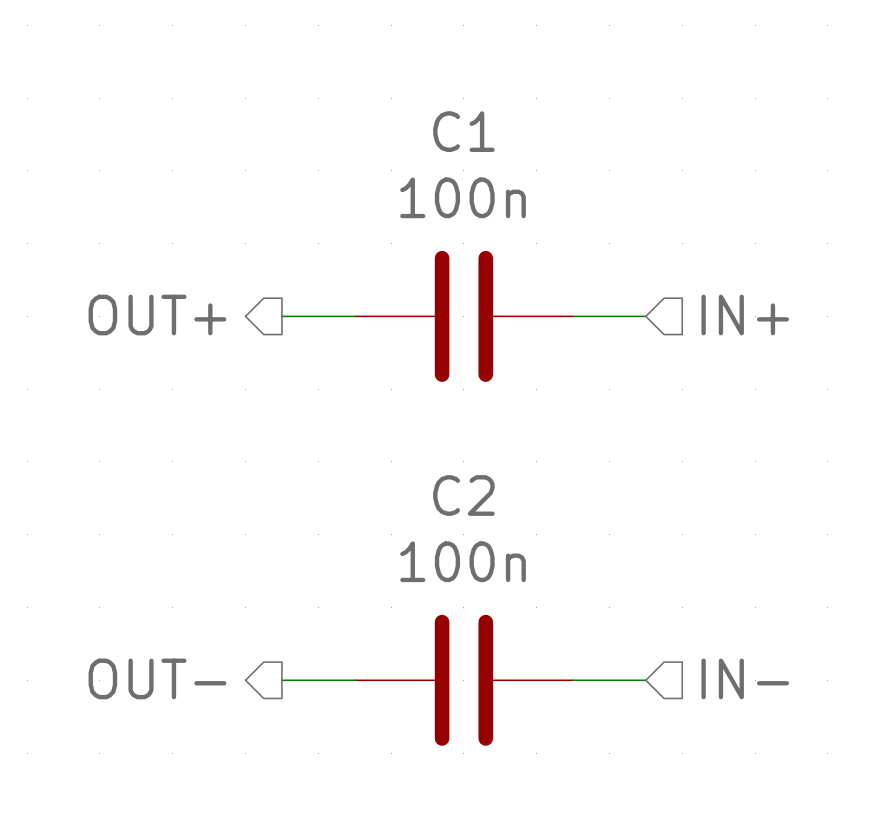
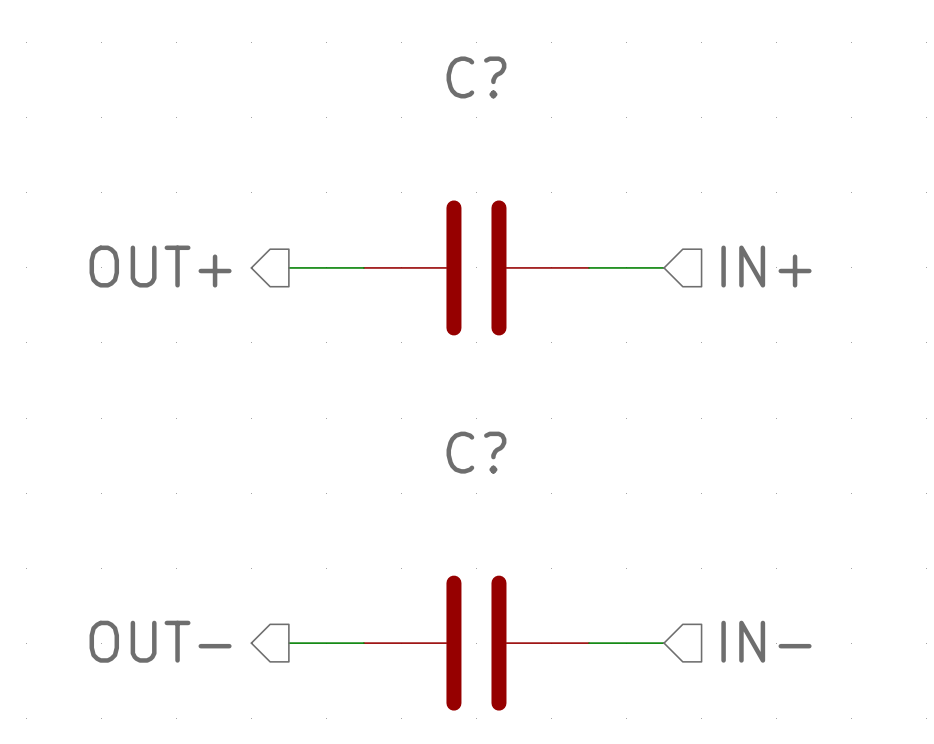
C1 name: C1 (463, 131) -> C? (476, 77)
C1 value: 100n (463, 197) -> none
C2 name: C2 (463, 495) -> C? (476, 452)
C2 value: 100n (463, 561) -> none

